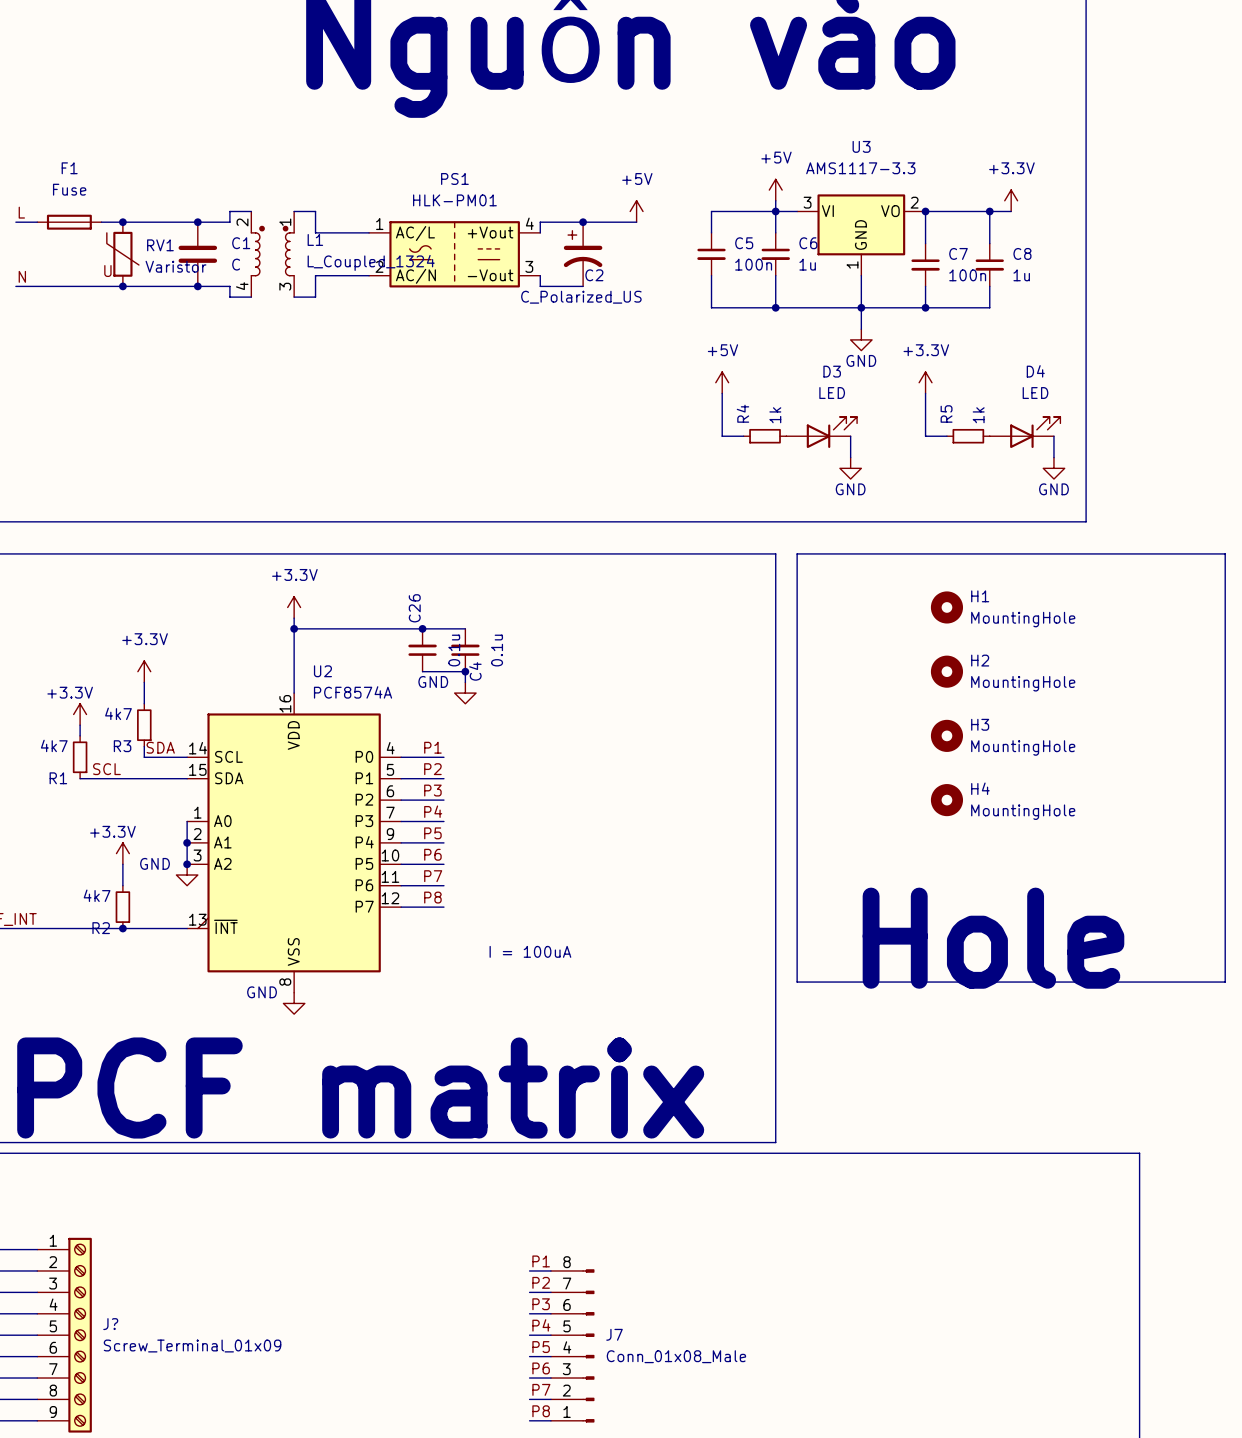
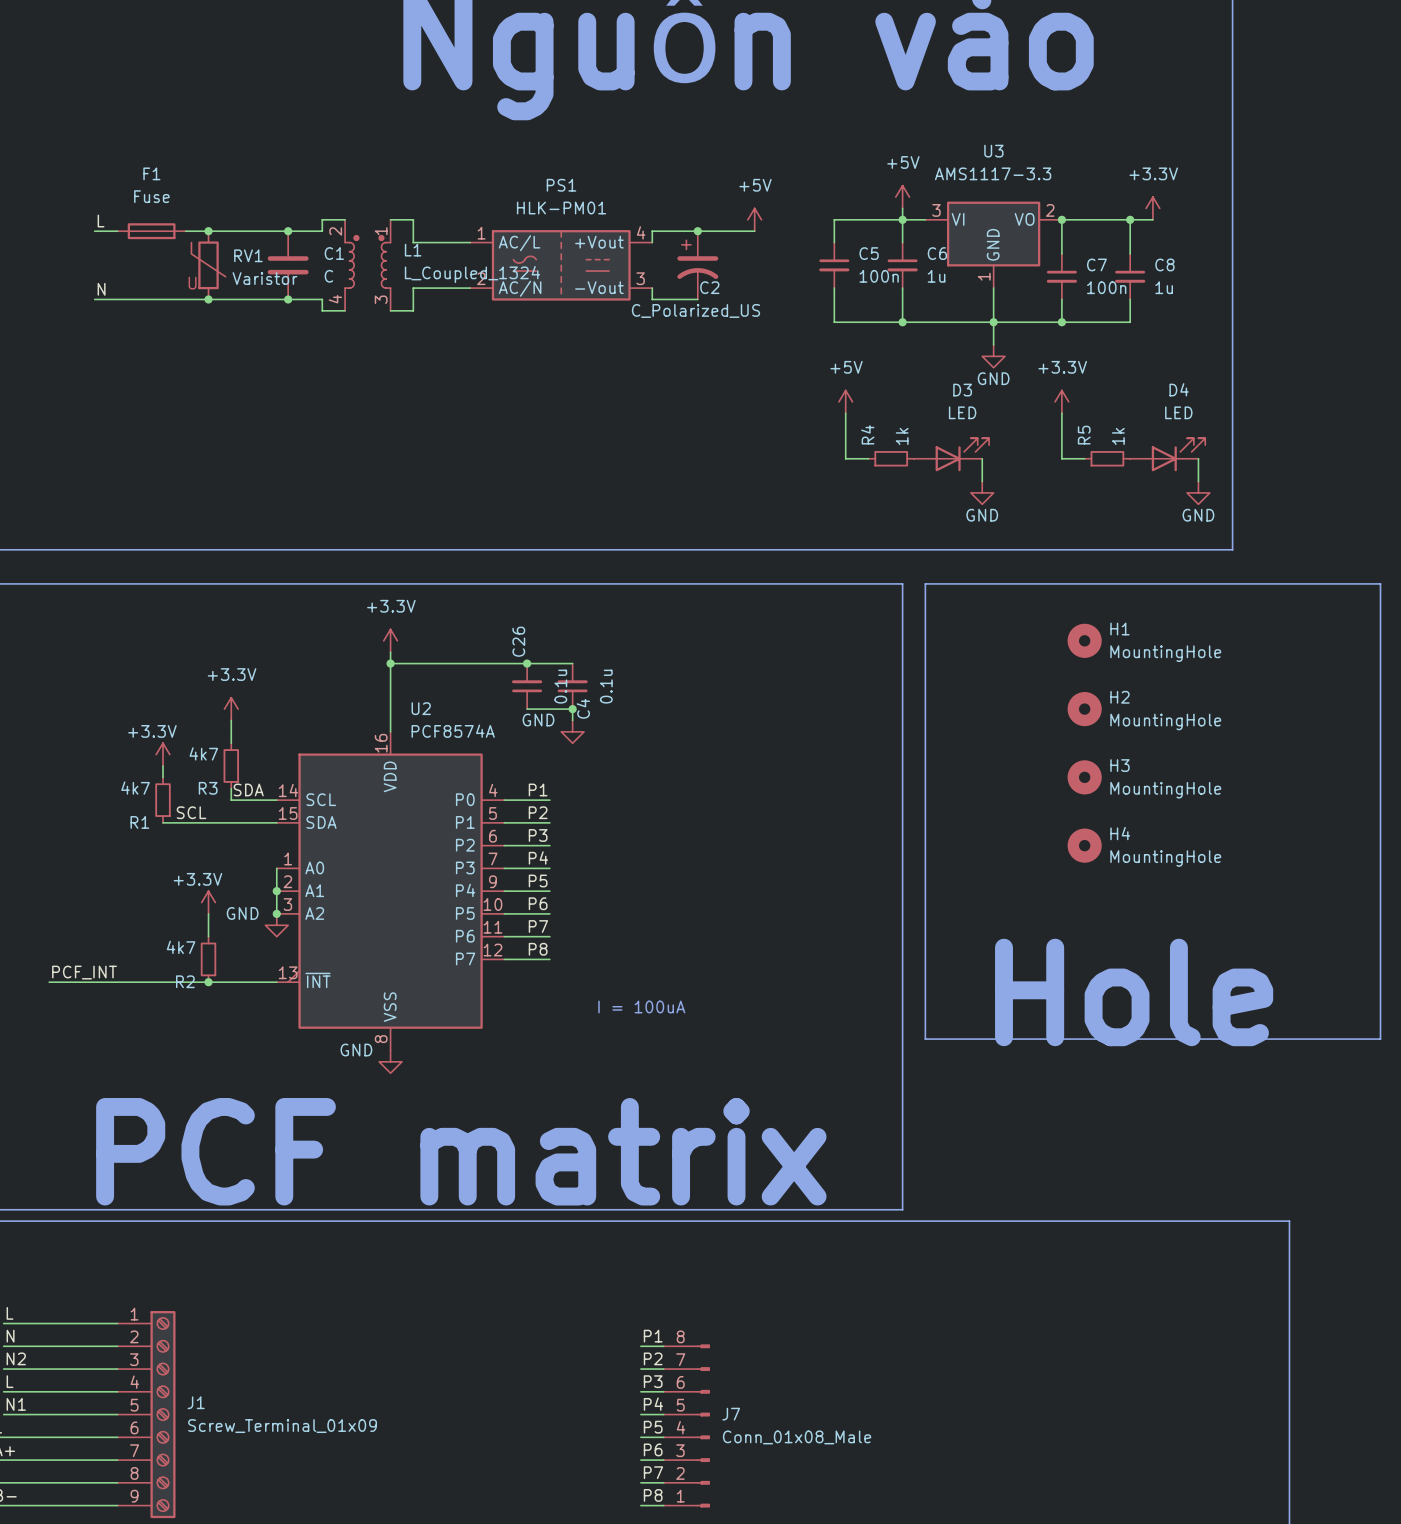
J? name: J? (110, 1324) -> J1 (196, 1402)

